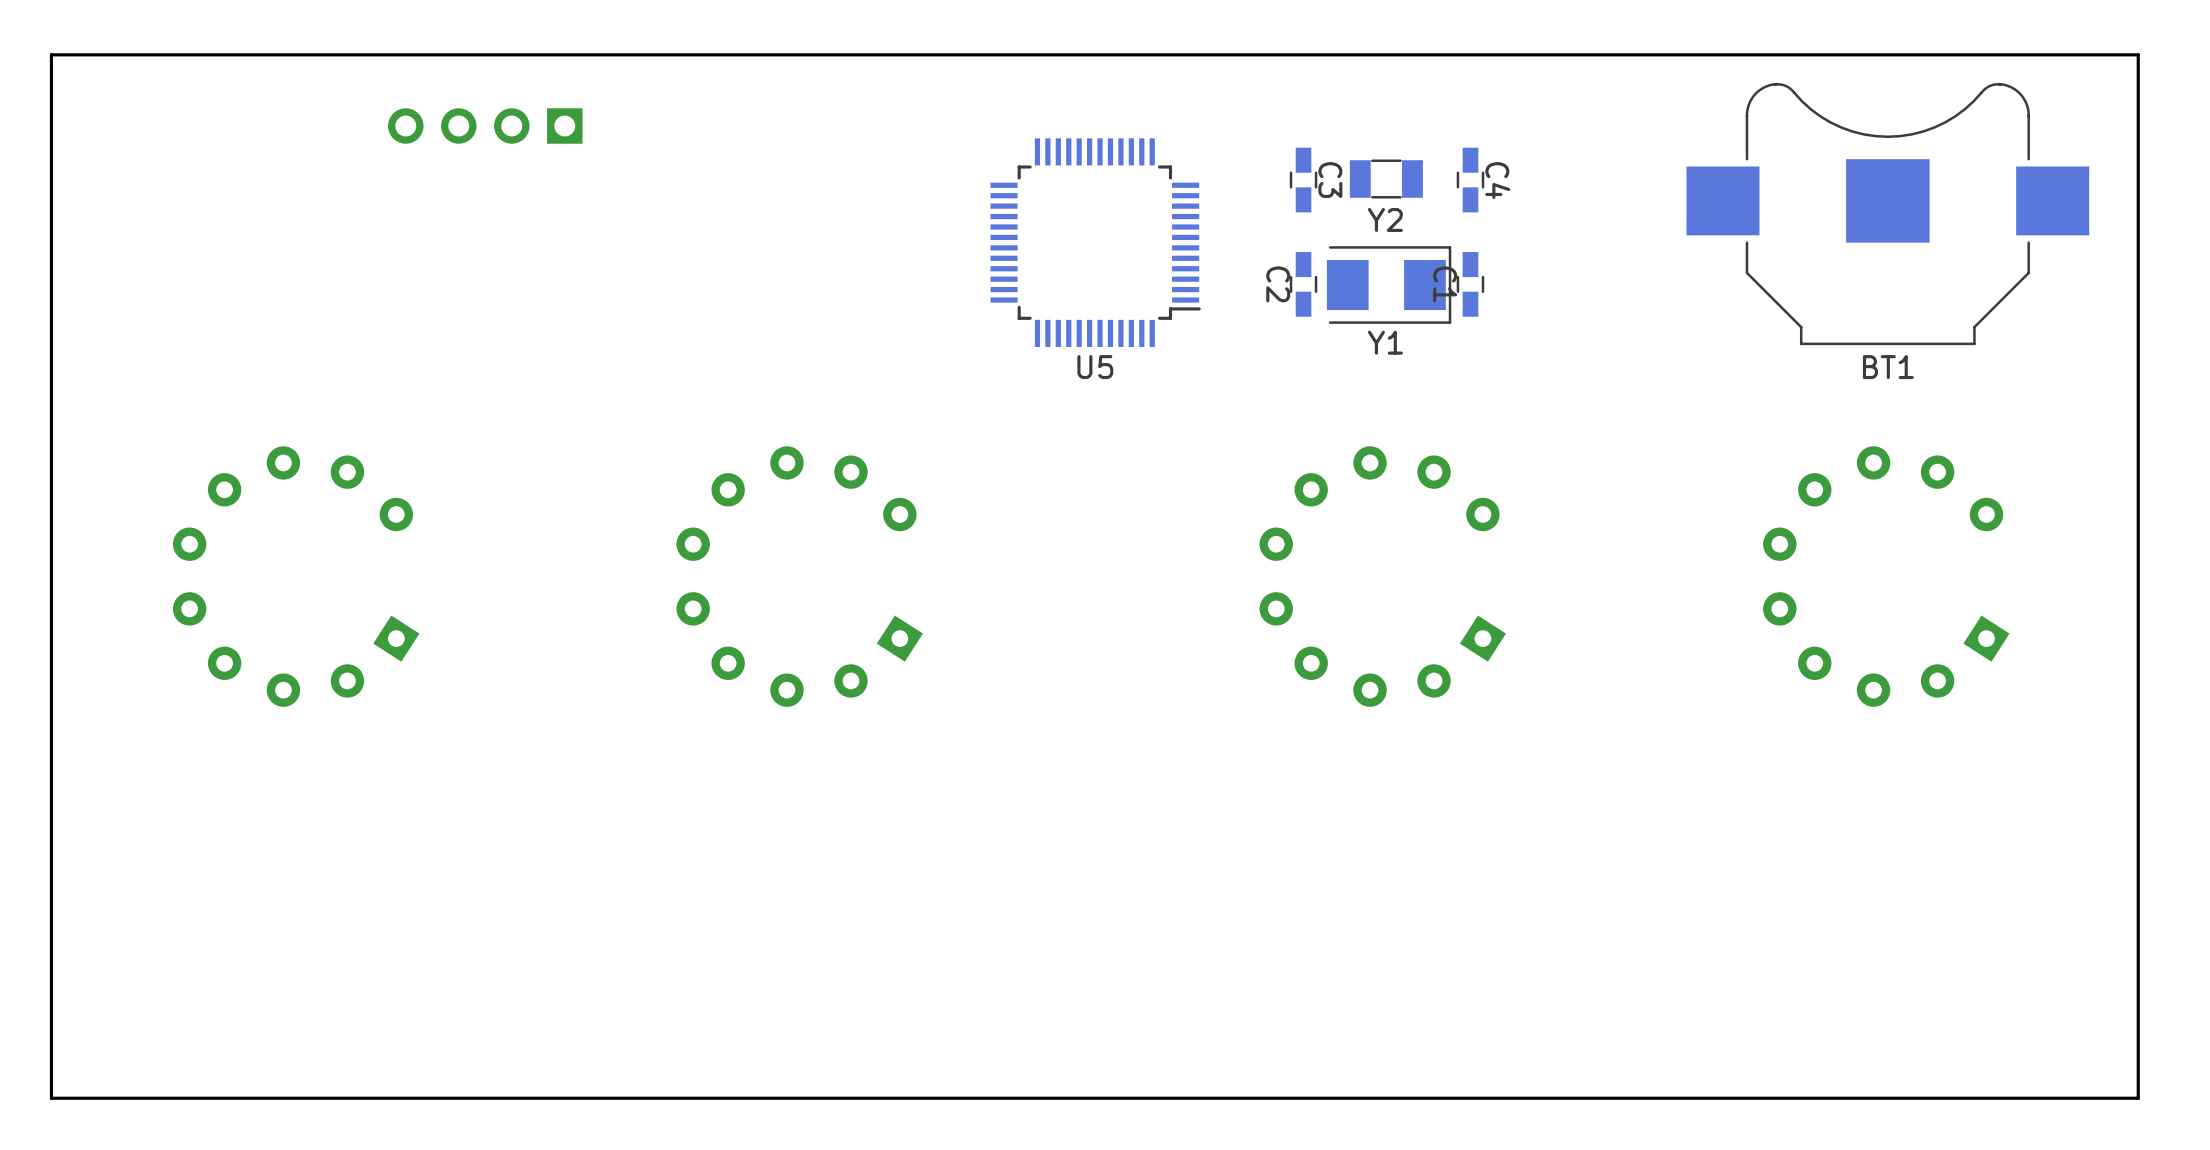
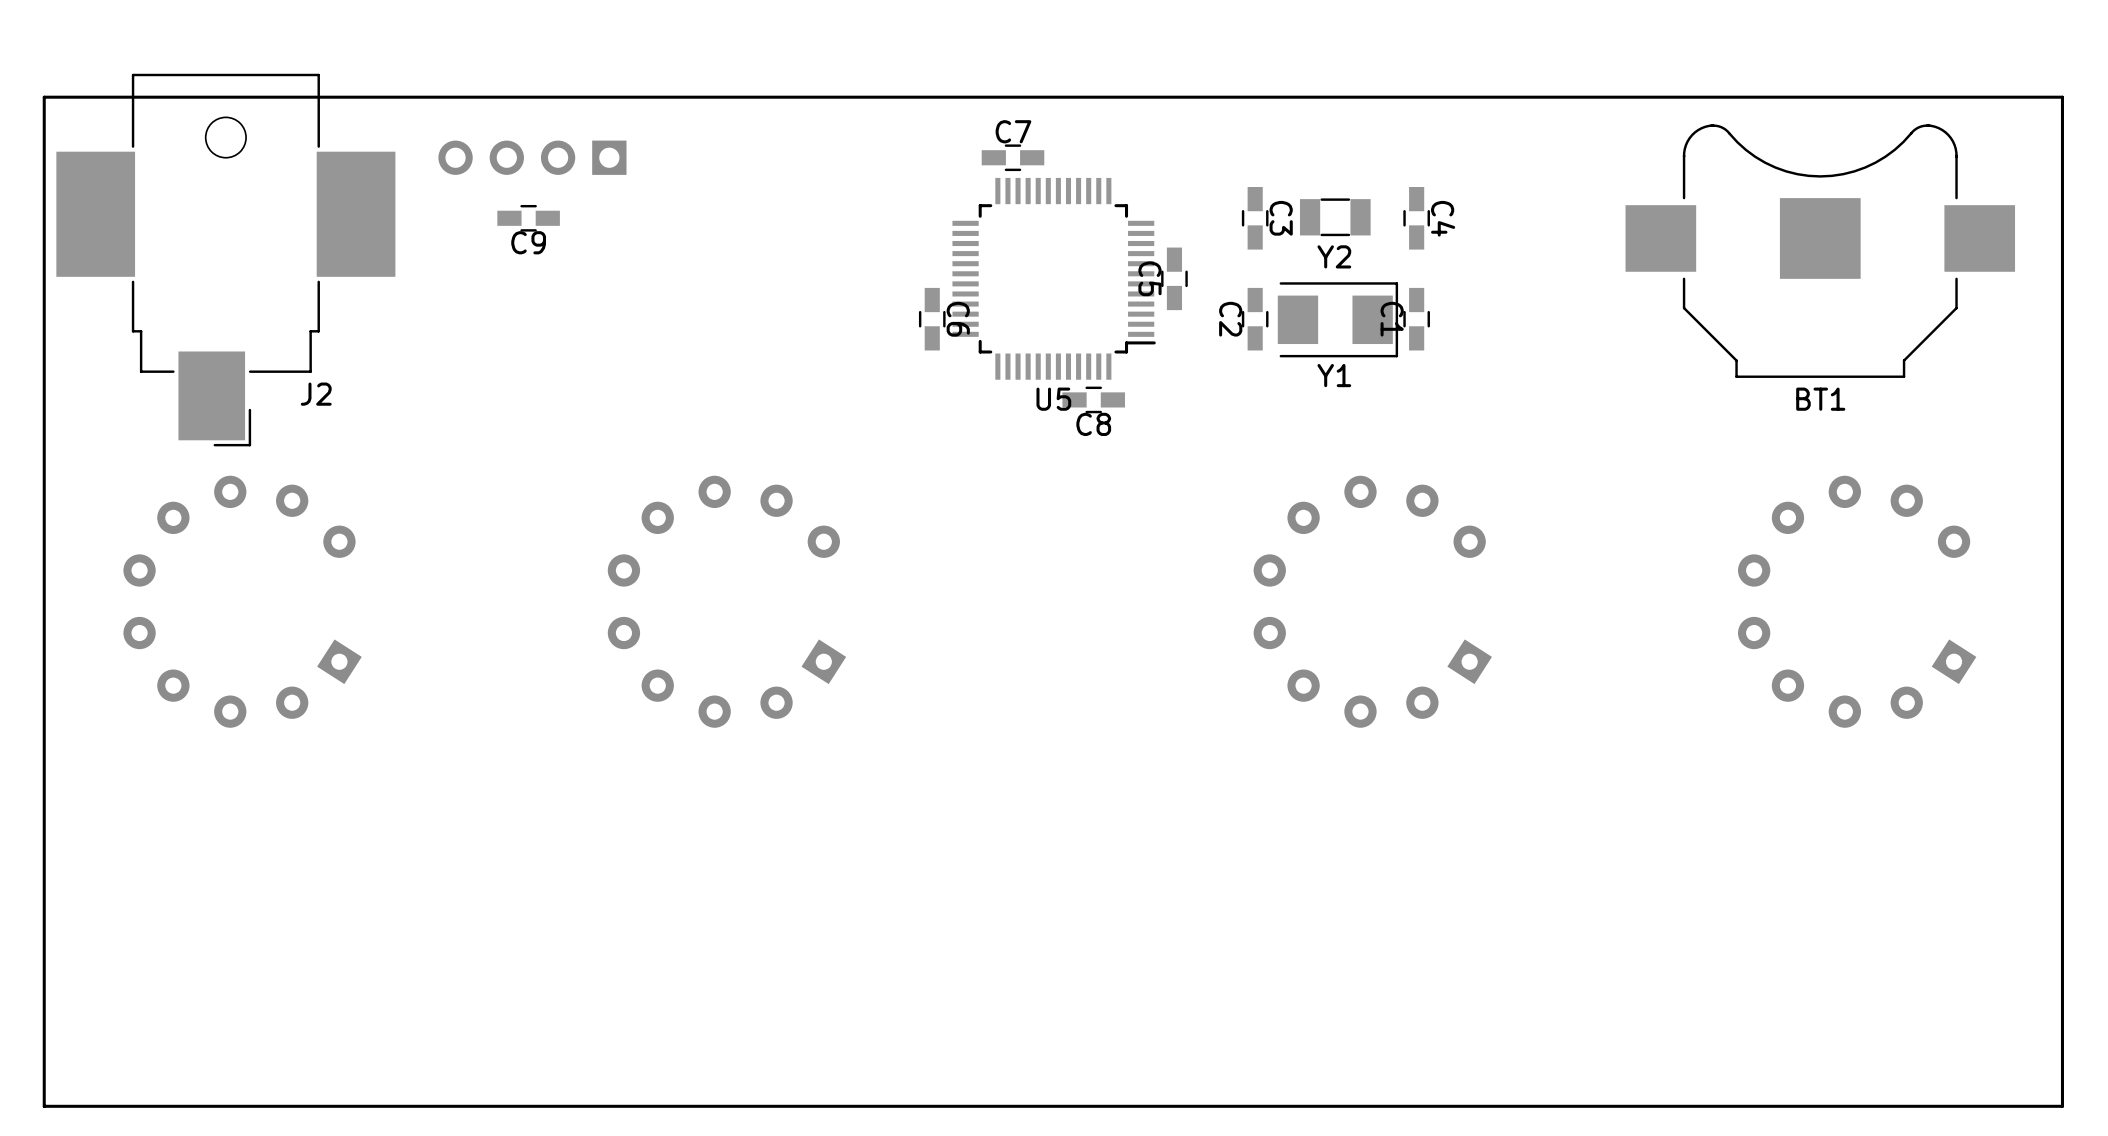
C7: none -> (1012, 157)
part position: (485, 126) -> (532, 157)
C9: none -> (528, 218)
J2: none -> (225, 260)
C5: none -> (1174, 278)
C6: none -> (932, 319)
C8: none -> (1093, 399)
part position: (296, 576) -> (242, 601)
part position: (799, 576) -> (726, 601)
part position: (1382, 576) -> (1372, 601)
part position: (1886, 576) -> (1857, 601)

